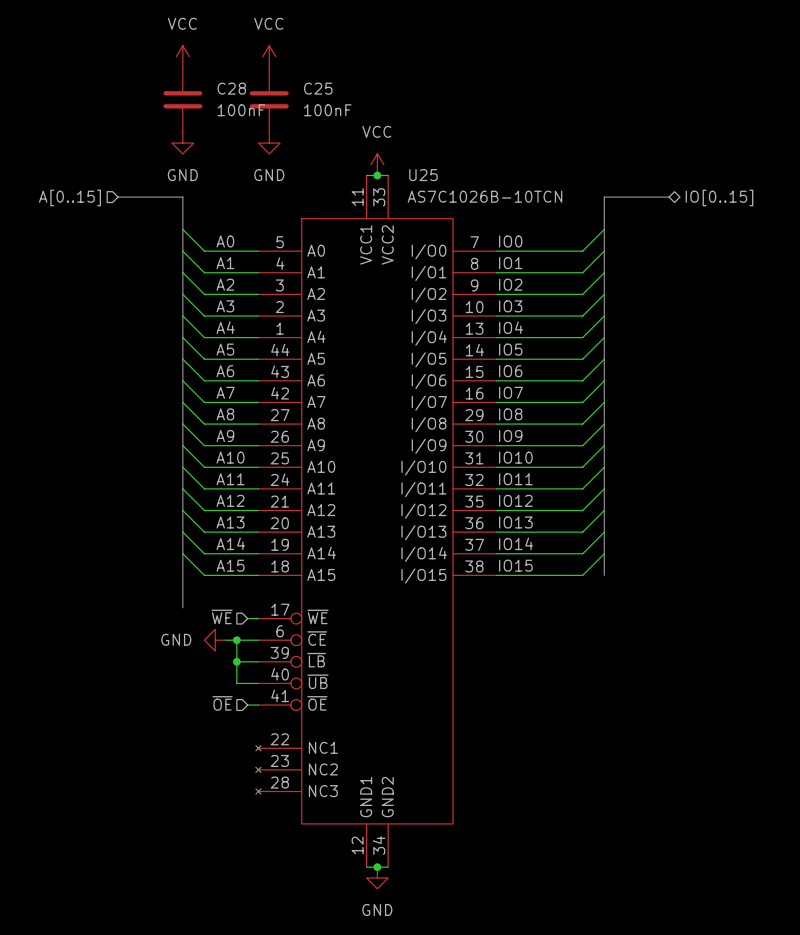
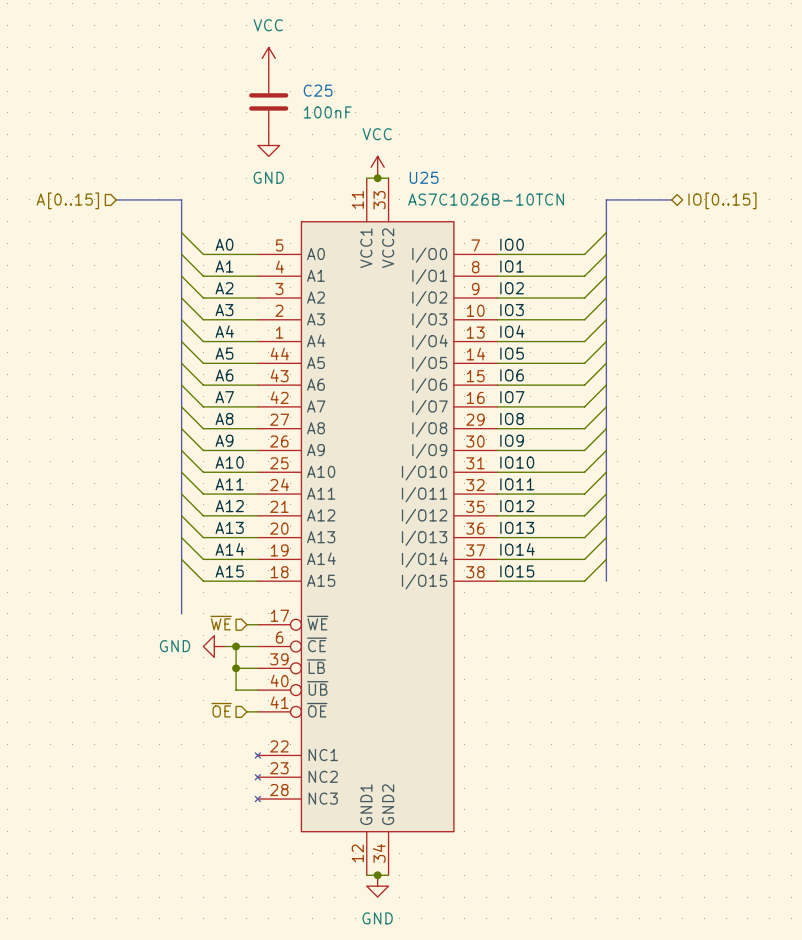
power symbol: VCC (182, 56) -> none
C28: 100nF (182, 99) -> none
power symbol: GND (182, 143) -> none

